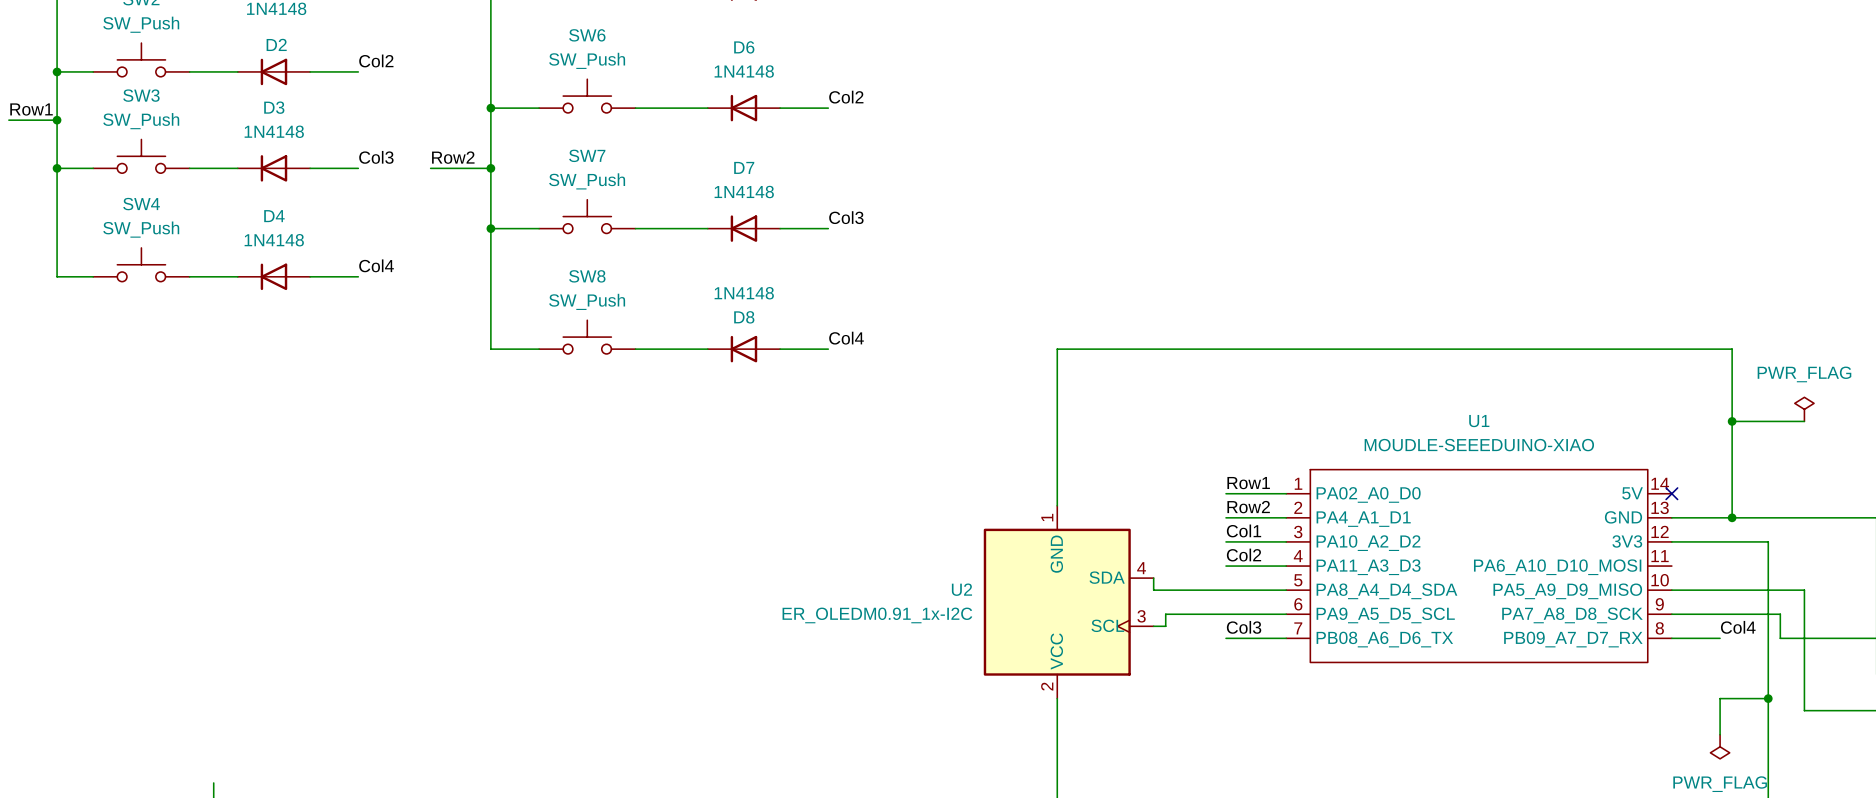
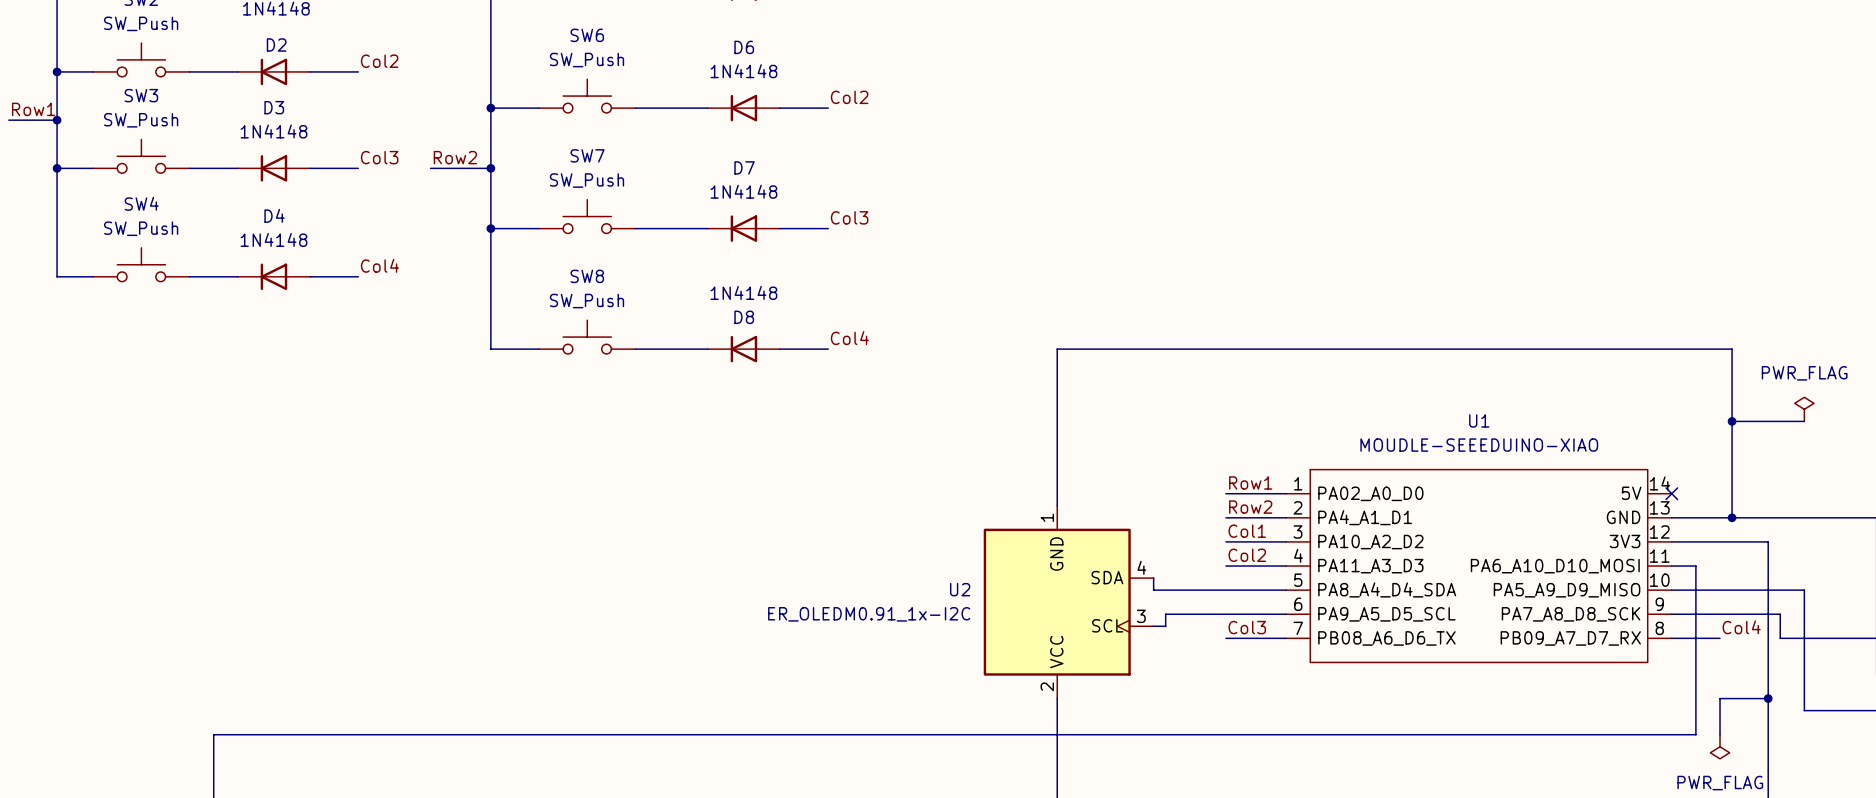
wire: none -> (1671, 566) (1695, 566) (1695, 734) (213, 734) (213, 782)

